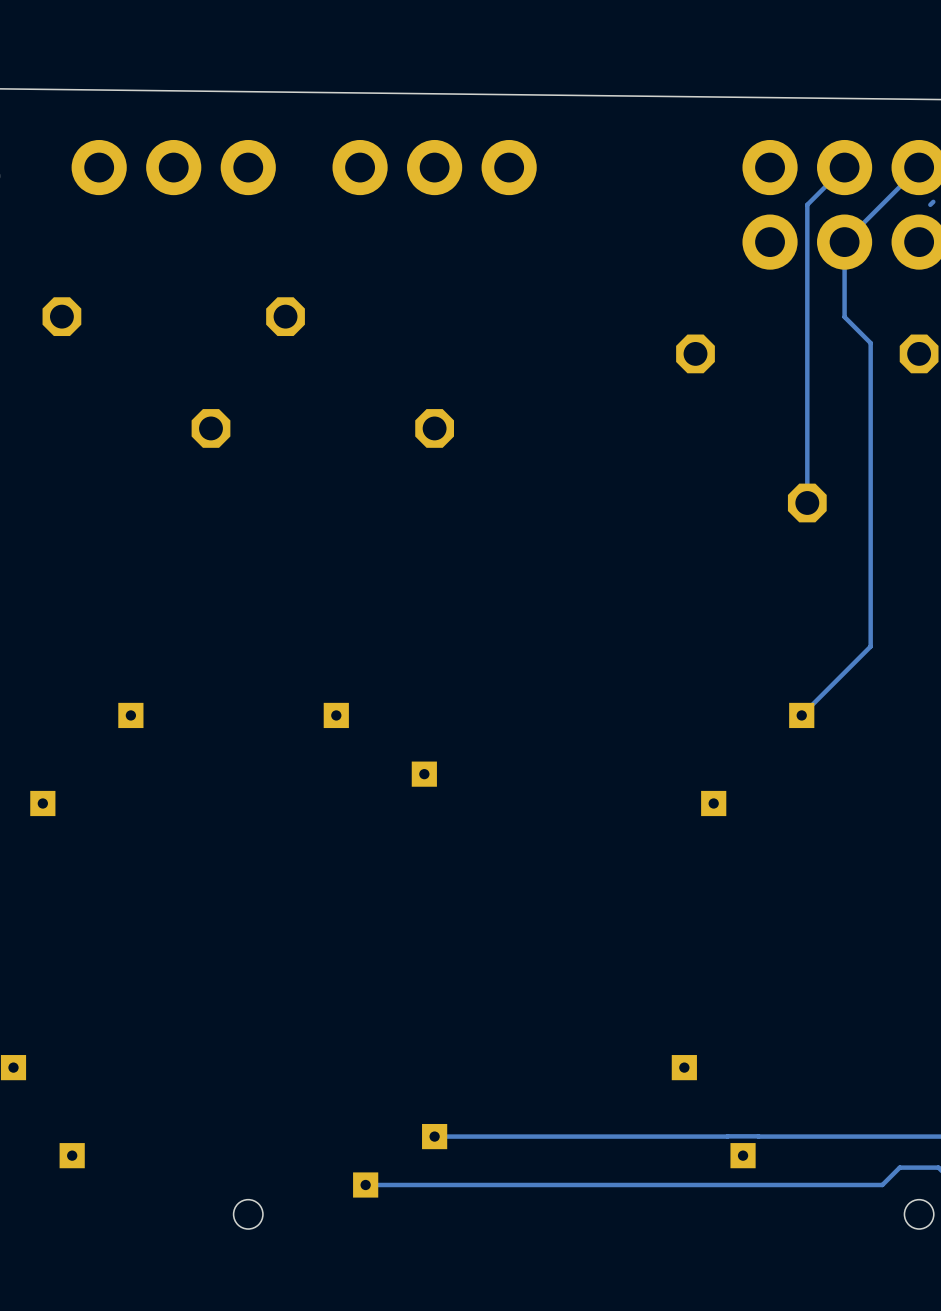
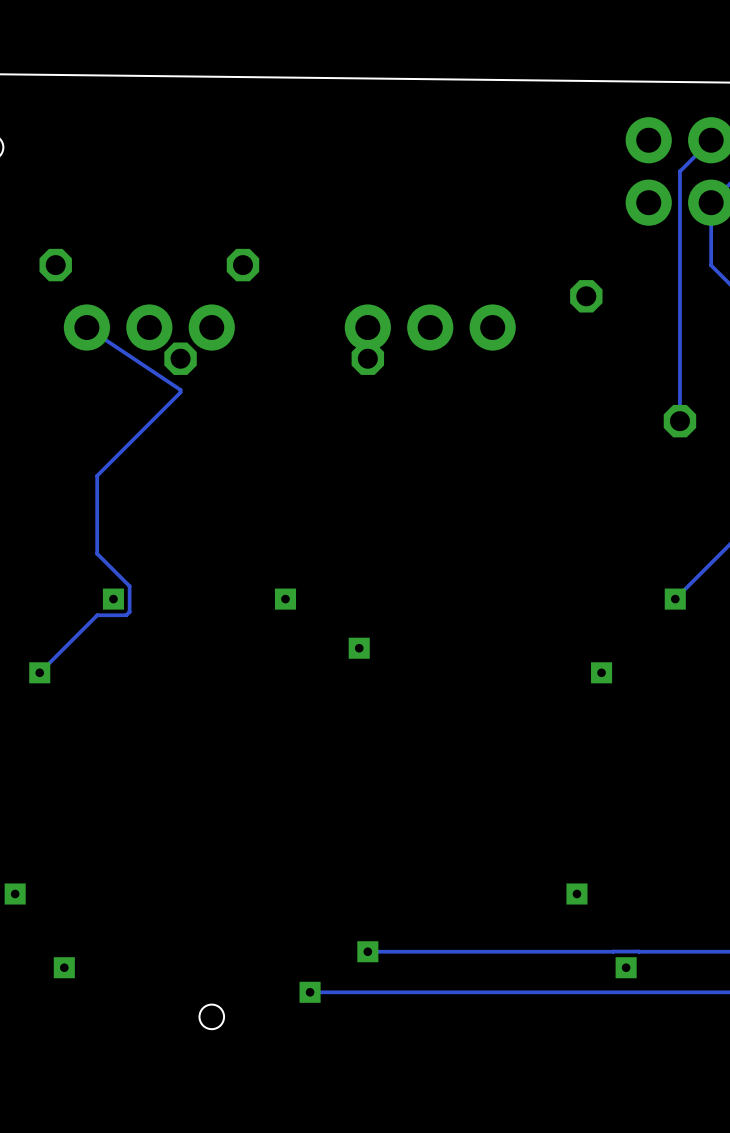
part: (173, 167) -> none
part: (434, 167) -> none
track: none -> (86, 327) (180, 389) (180, 392) (97, 475) (97, 553) (129, 586) (129, 611) (126, 615) (97, 615) (39, 672)
part: none -> (149, 327)
part: none -> (430, 327)

